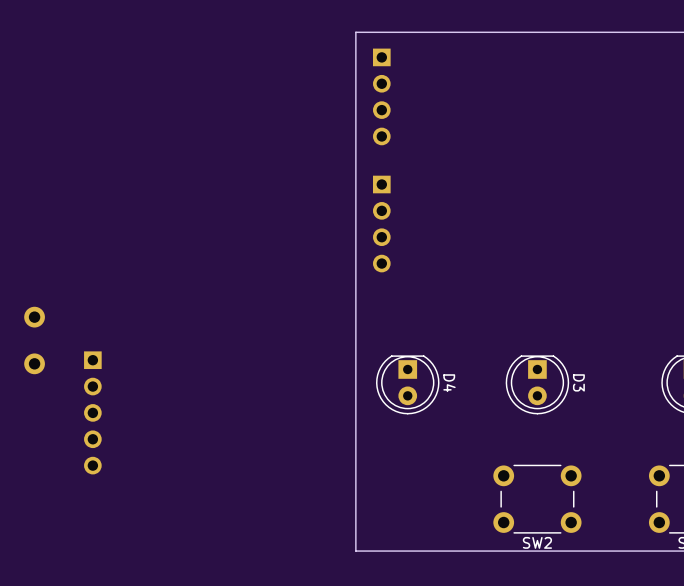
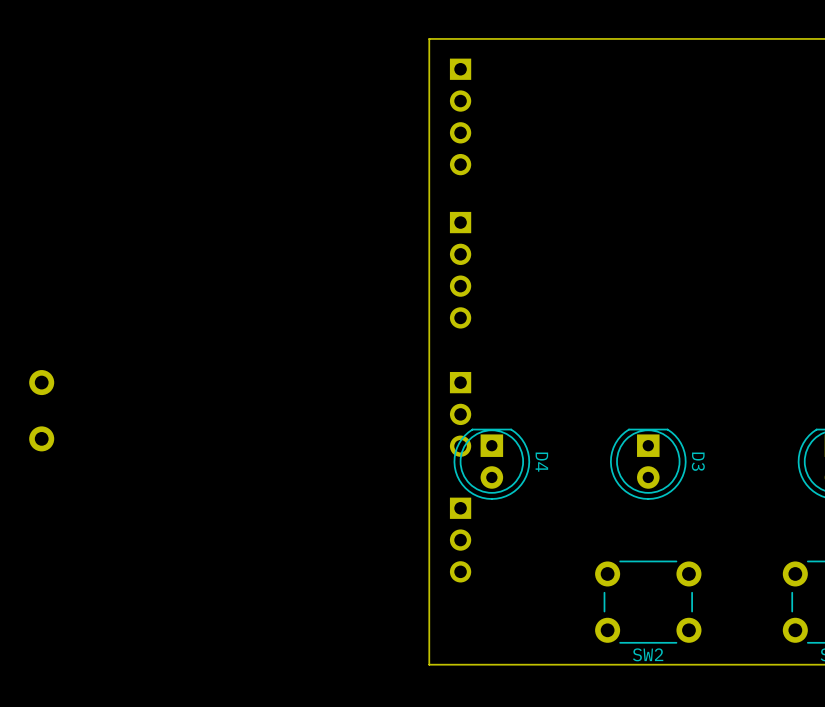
part: none -> (460, 414)
part: (92, 412) -> none
part: none -> (460, 540)

